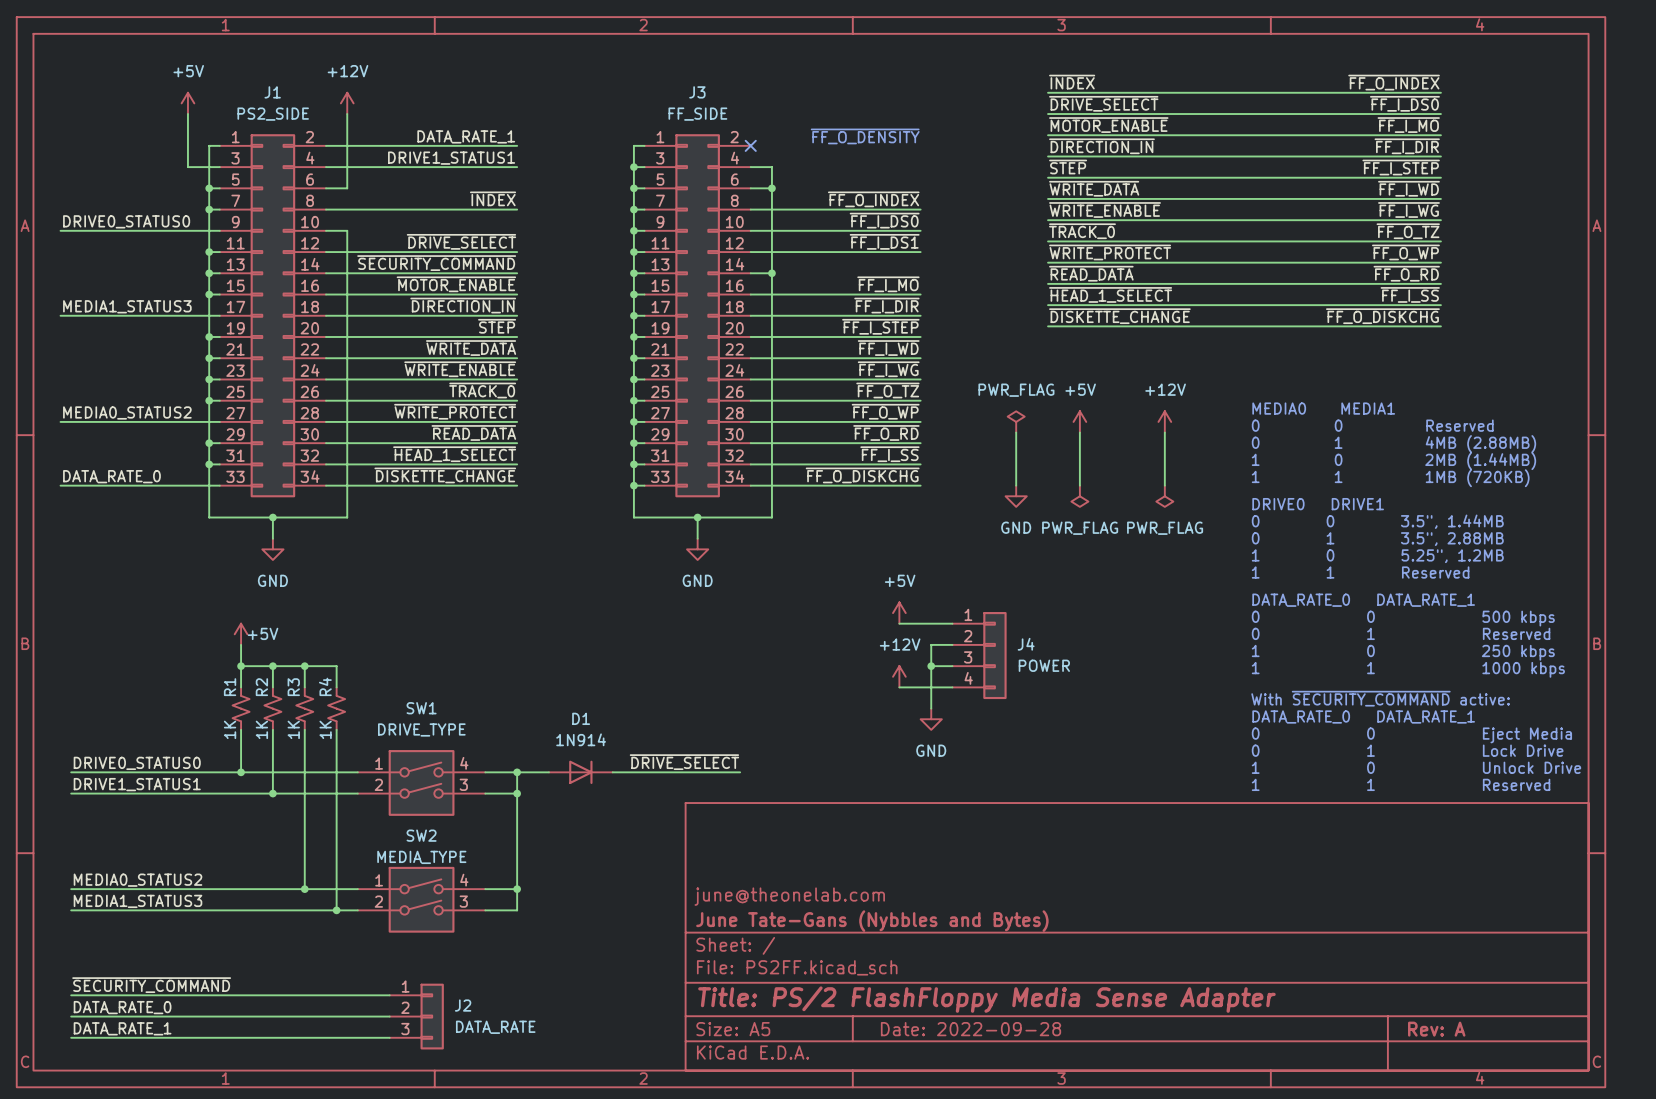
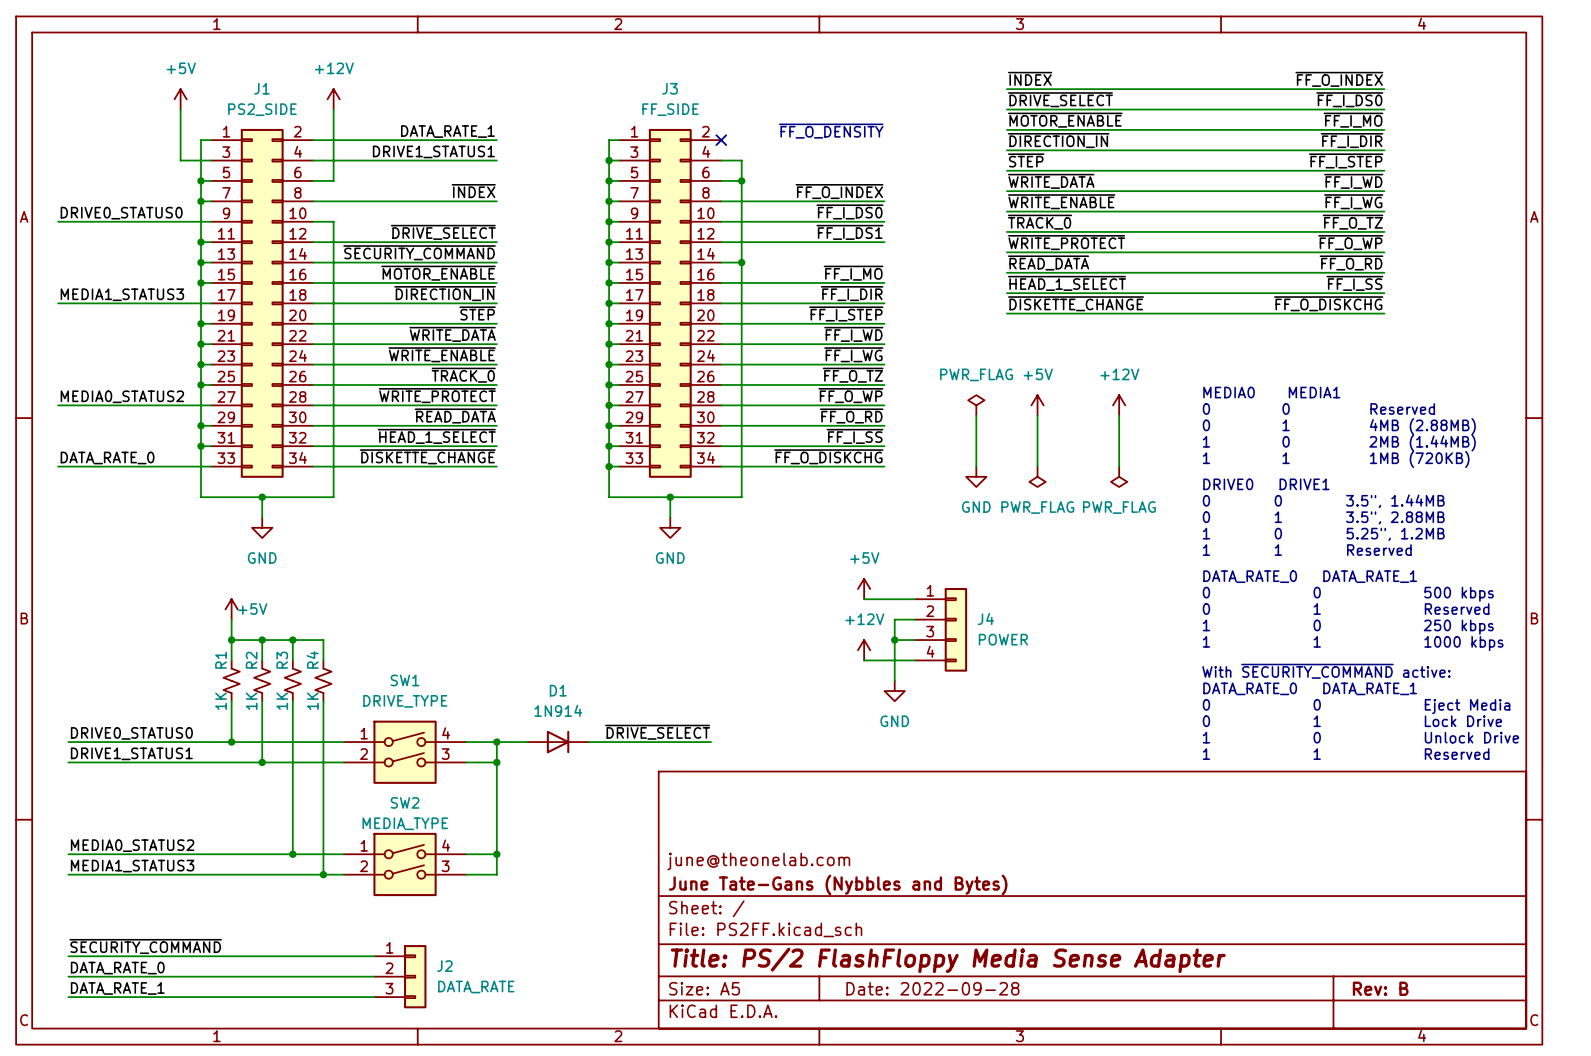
title block: Rev: A (1436, 1029) -> Rev: B (1380, 988)

